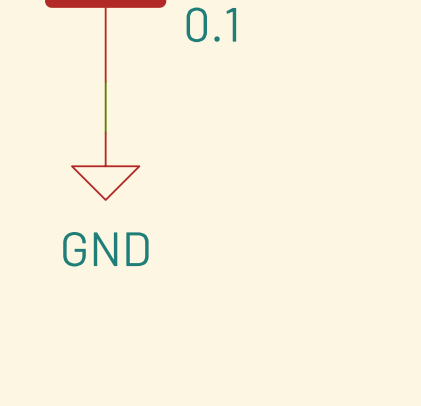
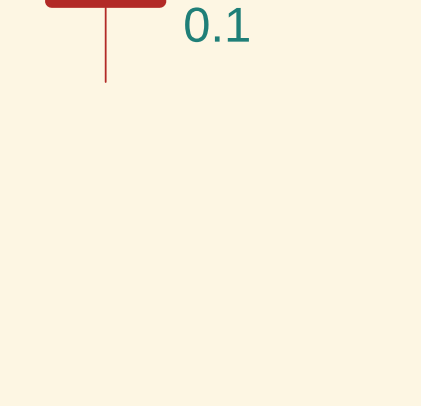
wire: (105, 82) (105, 132) -> none
power symbol: GND (105, 166) -> none

